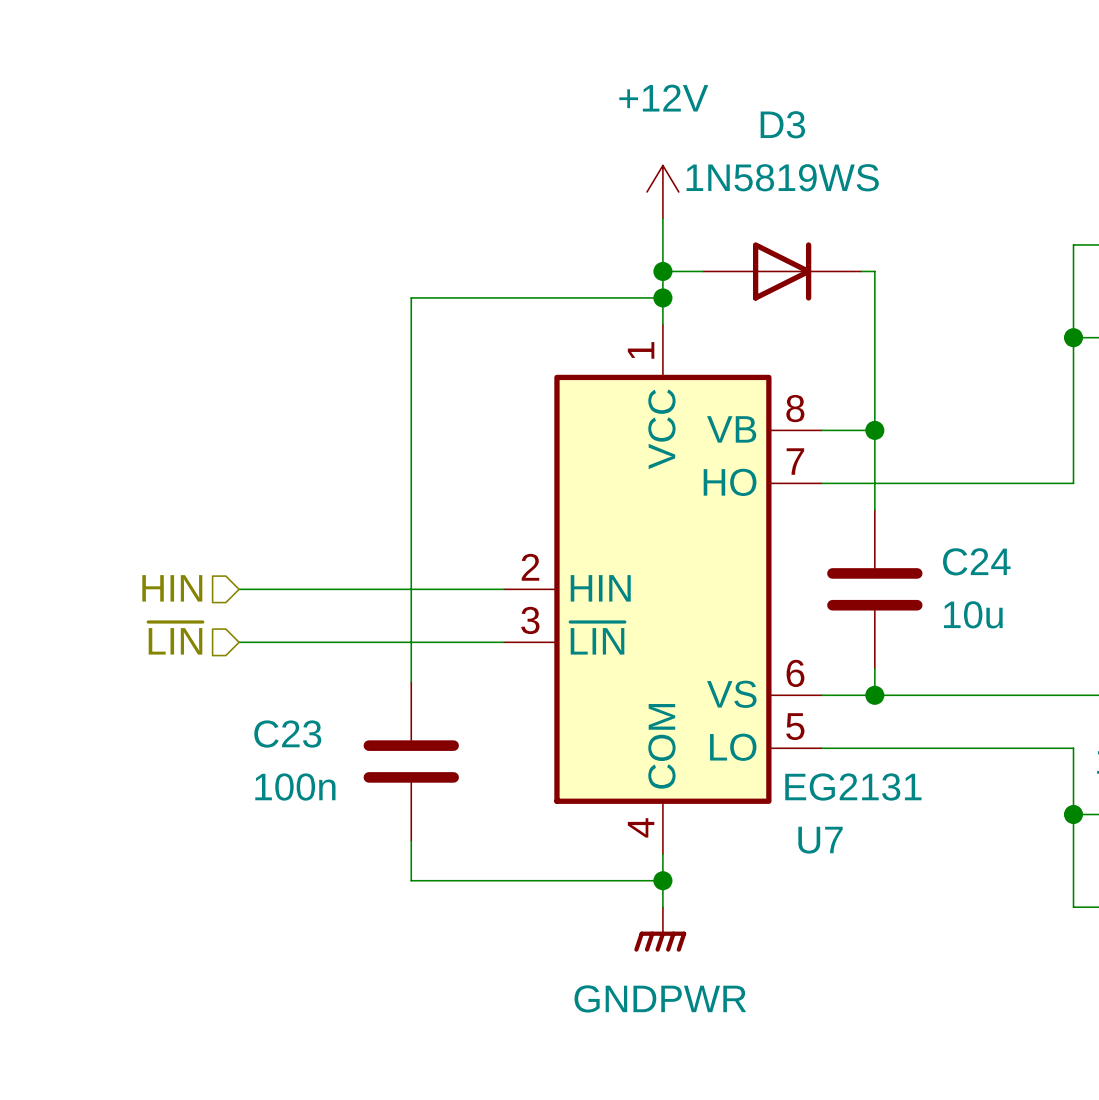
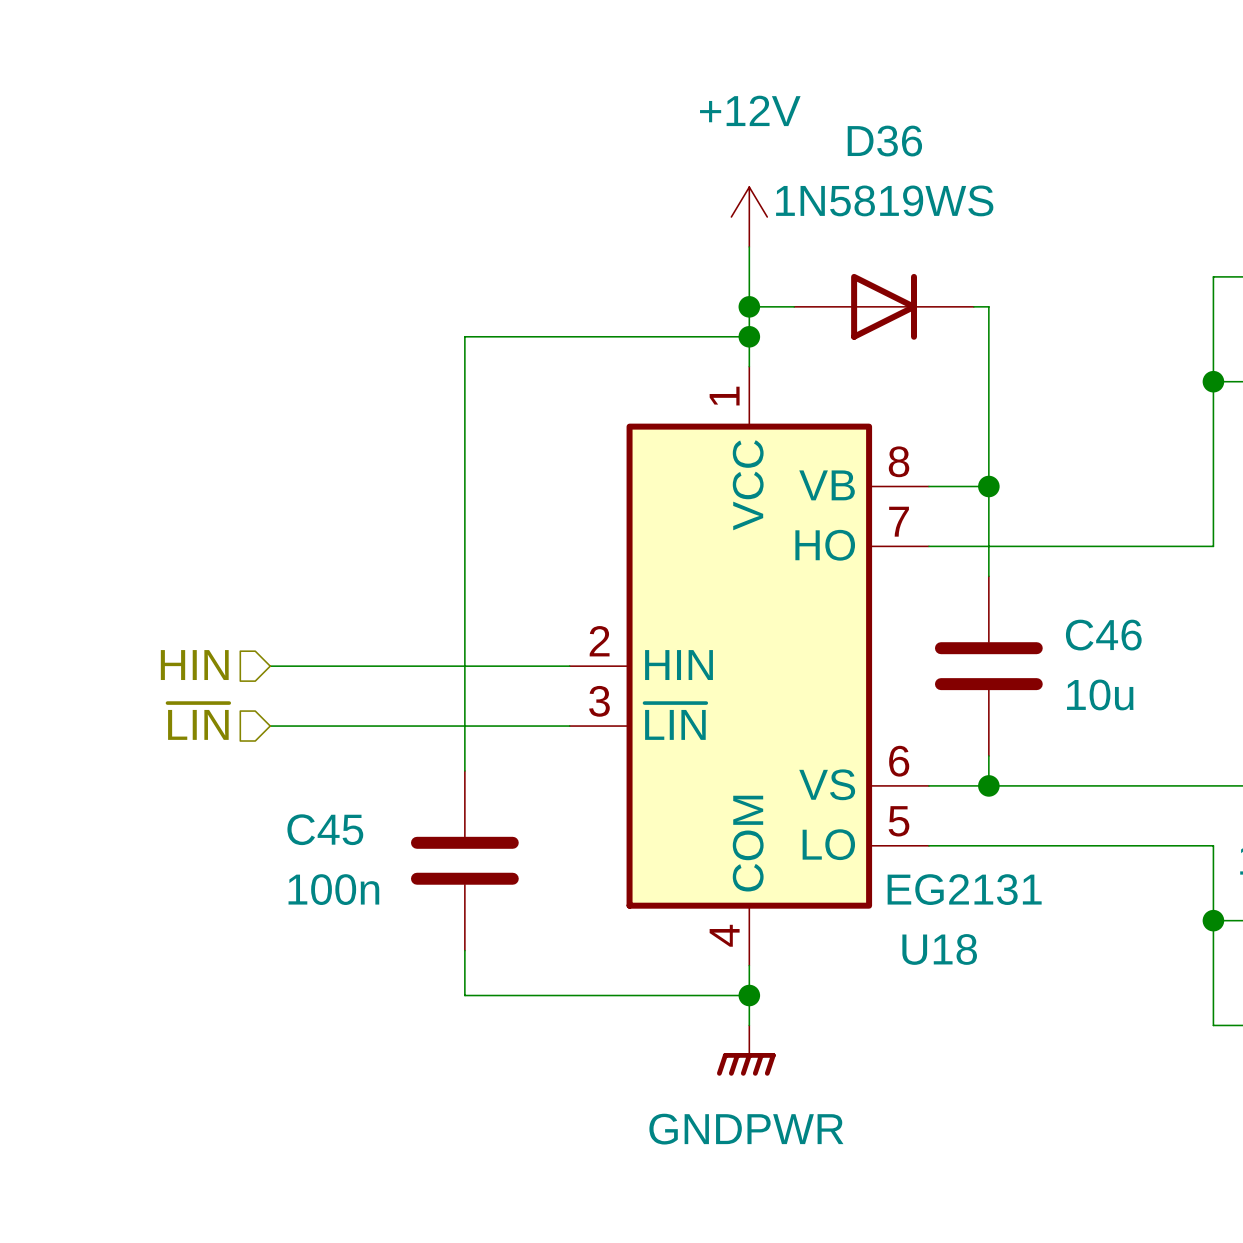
D3 name: D3 (782, 124) -> D36 (884, 141)
C24 name: C24 (976, 561) -> C46 (1103, 635)
C23 name: C23 (287, 734) -> C45 (325, 829)
U7 name: U7 (820, 840) -> U18 (939, 949)

